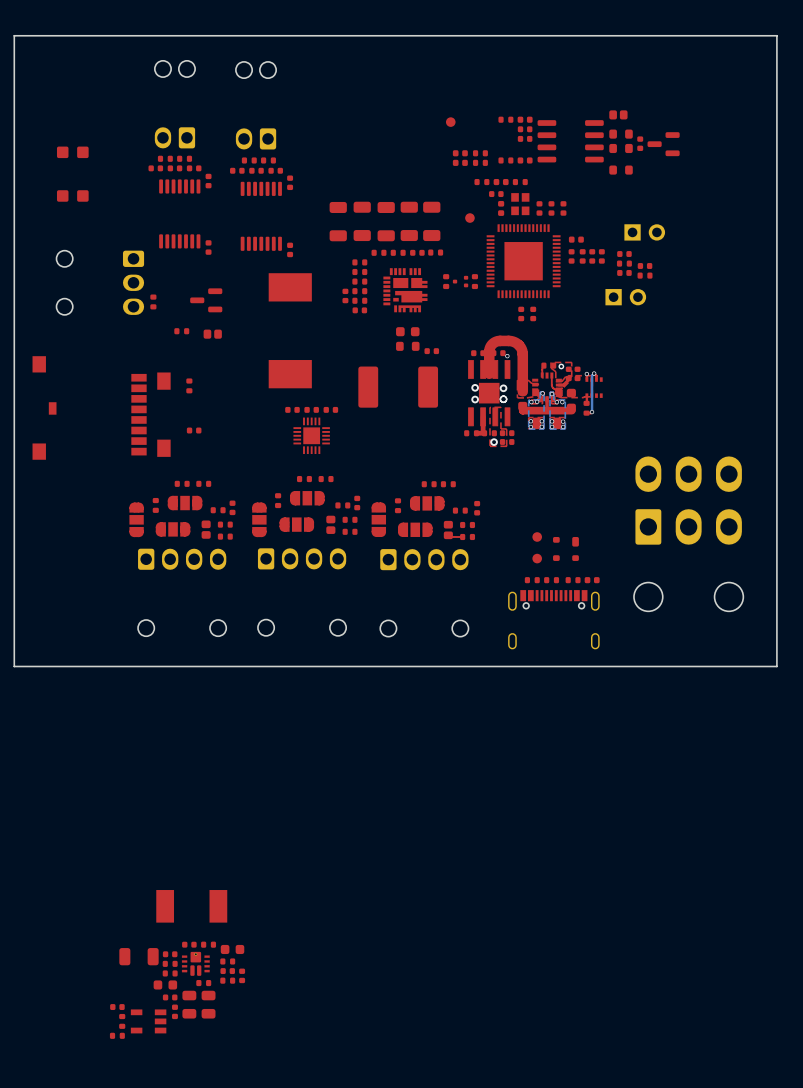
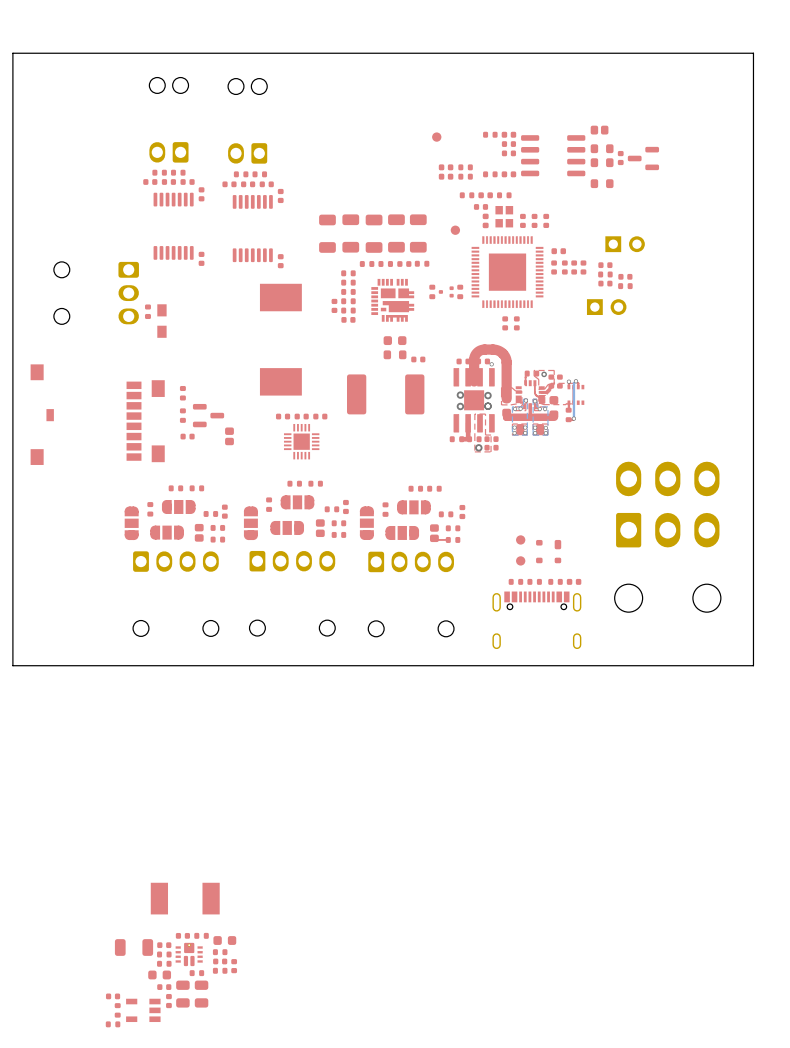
part: (72, 152) -> none
part: (72, 195) -> none
part rotation: 0° (206, 300) -> 180° (208, 415)
part position: (206, 300) -> (208, 415)
part: none -> (161, 321)
part rotation: 0° (181, 331) -> 90° clockwise (182, 415)
part position: (181, 331) -> (182, 415)
part rotation: 0° (212, 334) -> 90° clockwise (229, 436)
part position: (212, 334) -> (229, 436)

